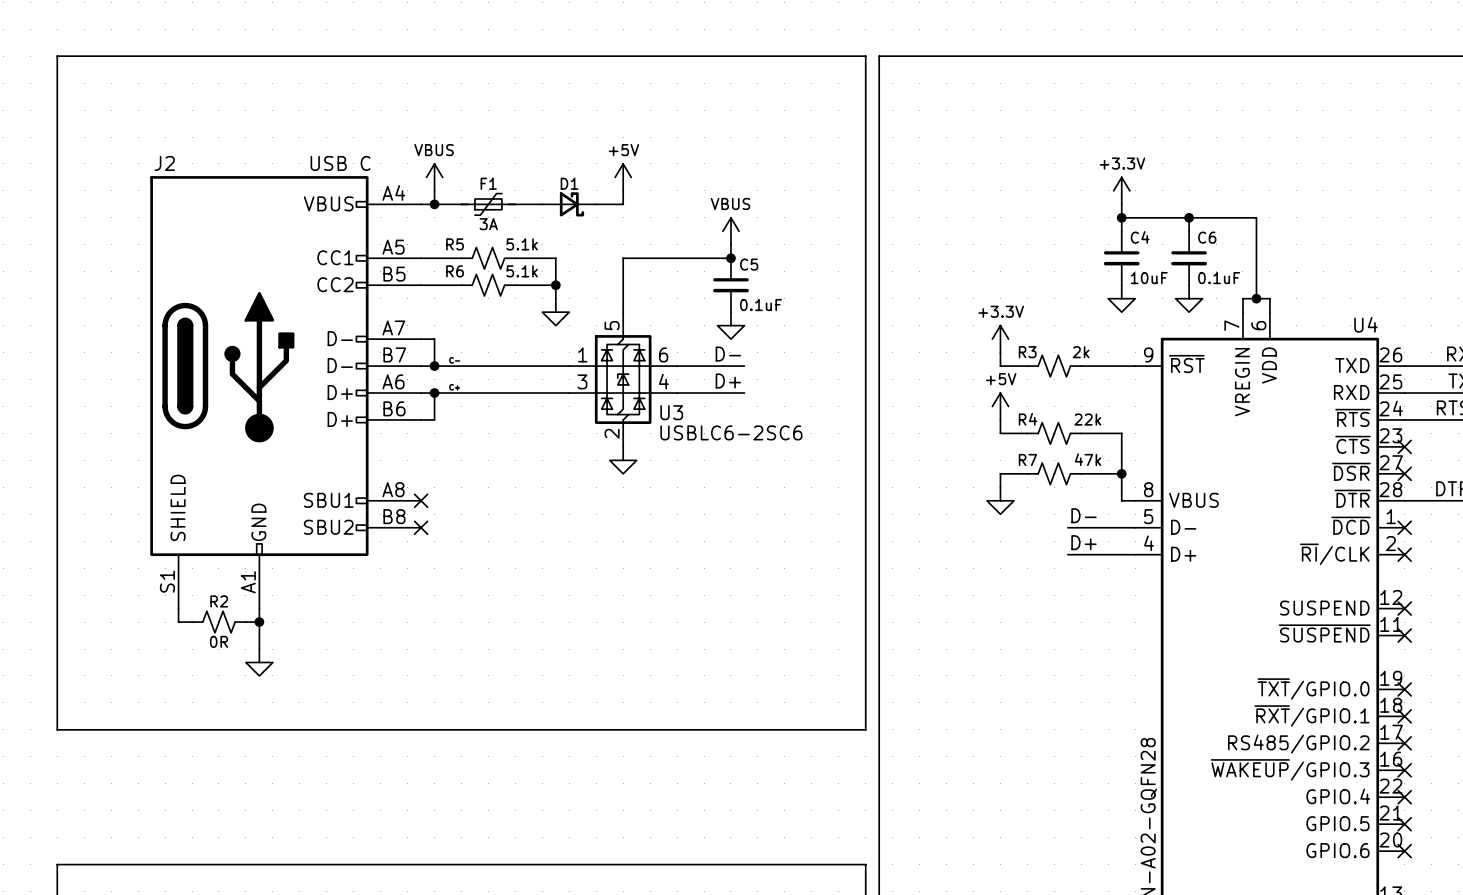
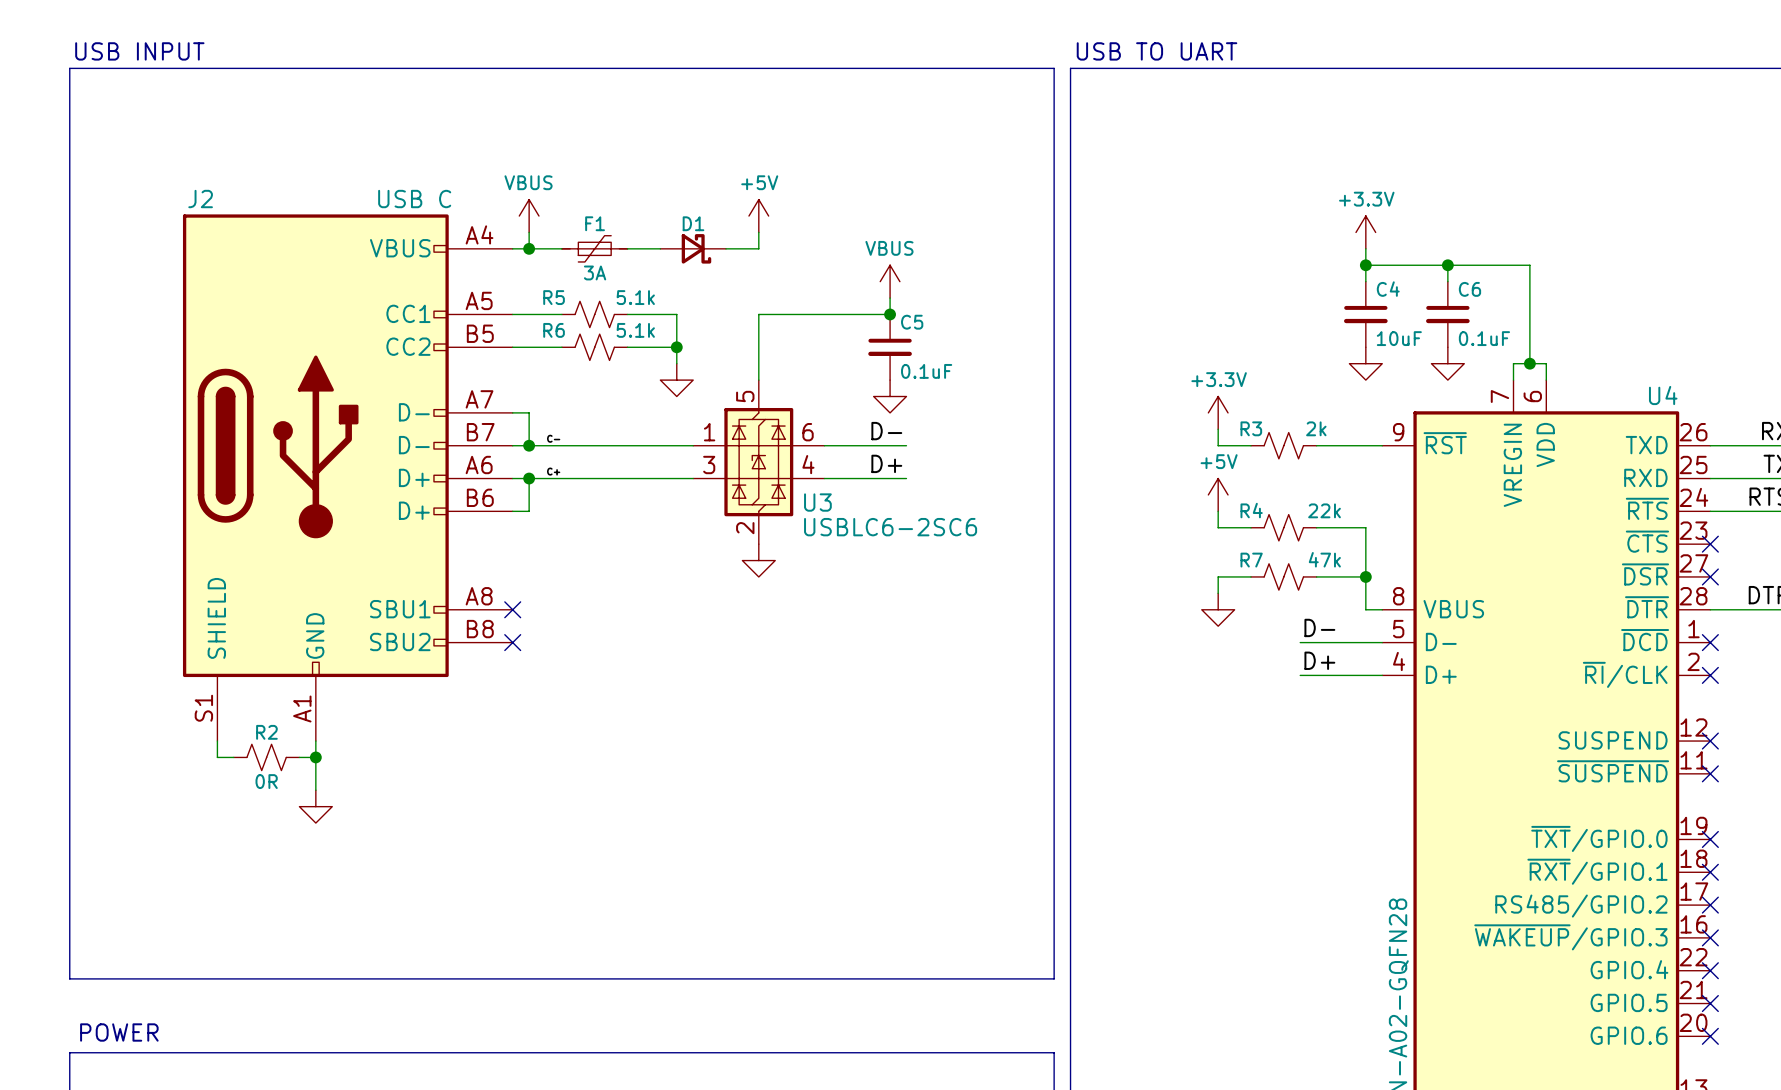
text: none -> USB INPUT (139, 51)
text: none -> USB TO UART (1157, 51)
line: (57, 729) (865, 729) -> (69, 888) (69, 978) (1054, 978) (1054, 888)
text: none -> POWER (119, 1032)

